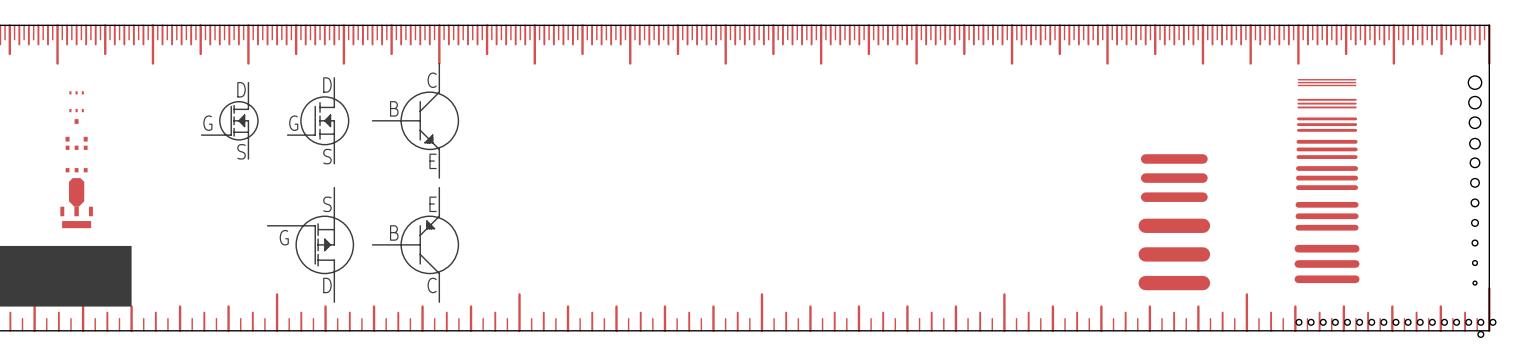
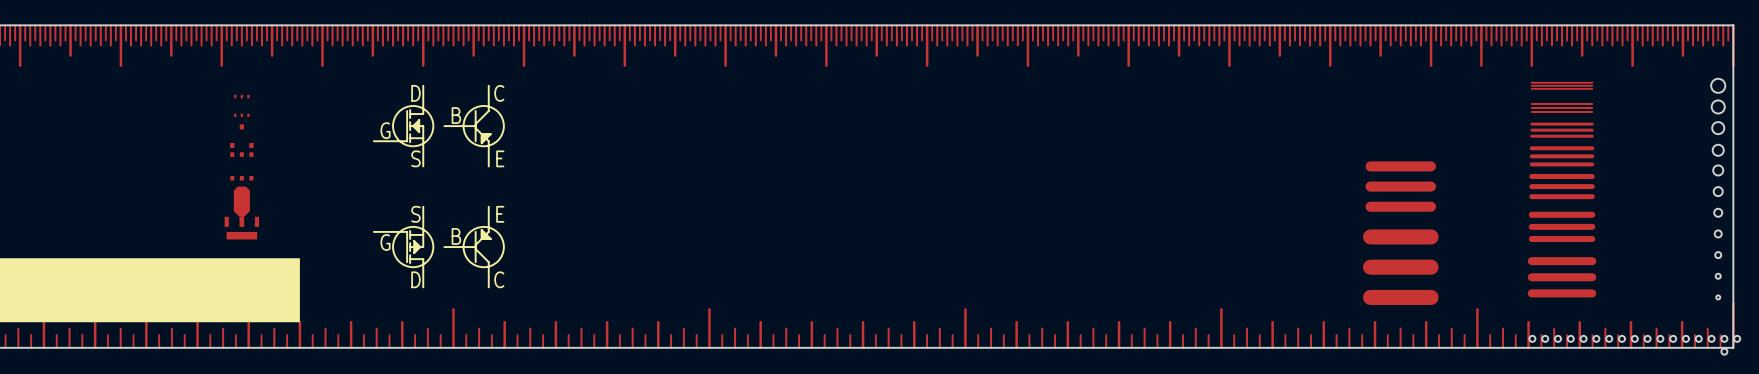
drawing: [371, 62, 460, 303] -> none
drawing: [286, 77, 350, 165] -> none
drawing shape: [200, 81, 259, 160] -> [373, 85, 435, 168]
drawing: none -> [443, 85, 505, 168]
drawing: [266, 186, 355, 303] -> none
drawing: none -> [373, 205, 505, 289]

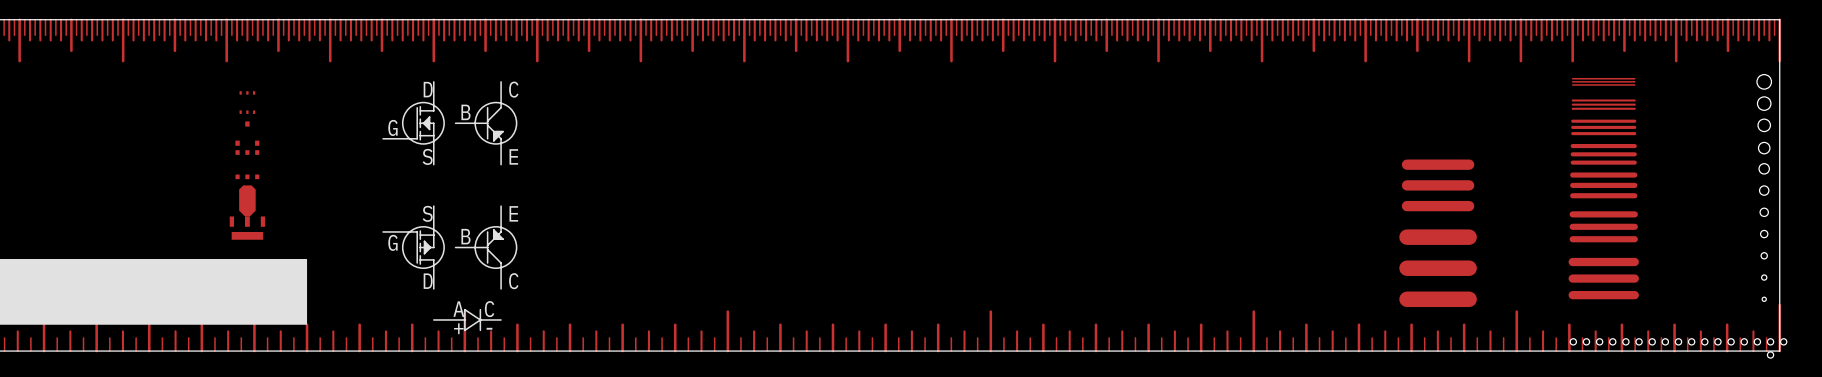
drawing: none -> [433, 308, 502, 332]

